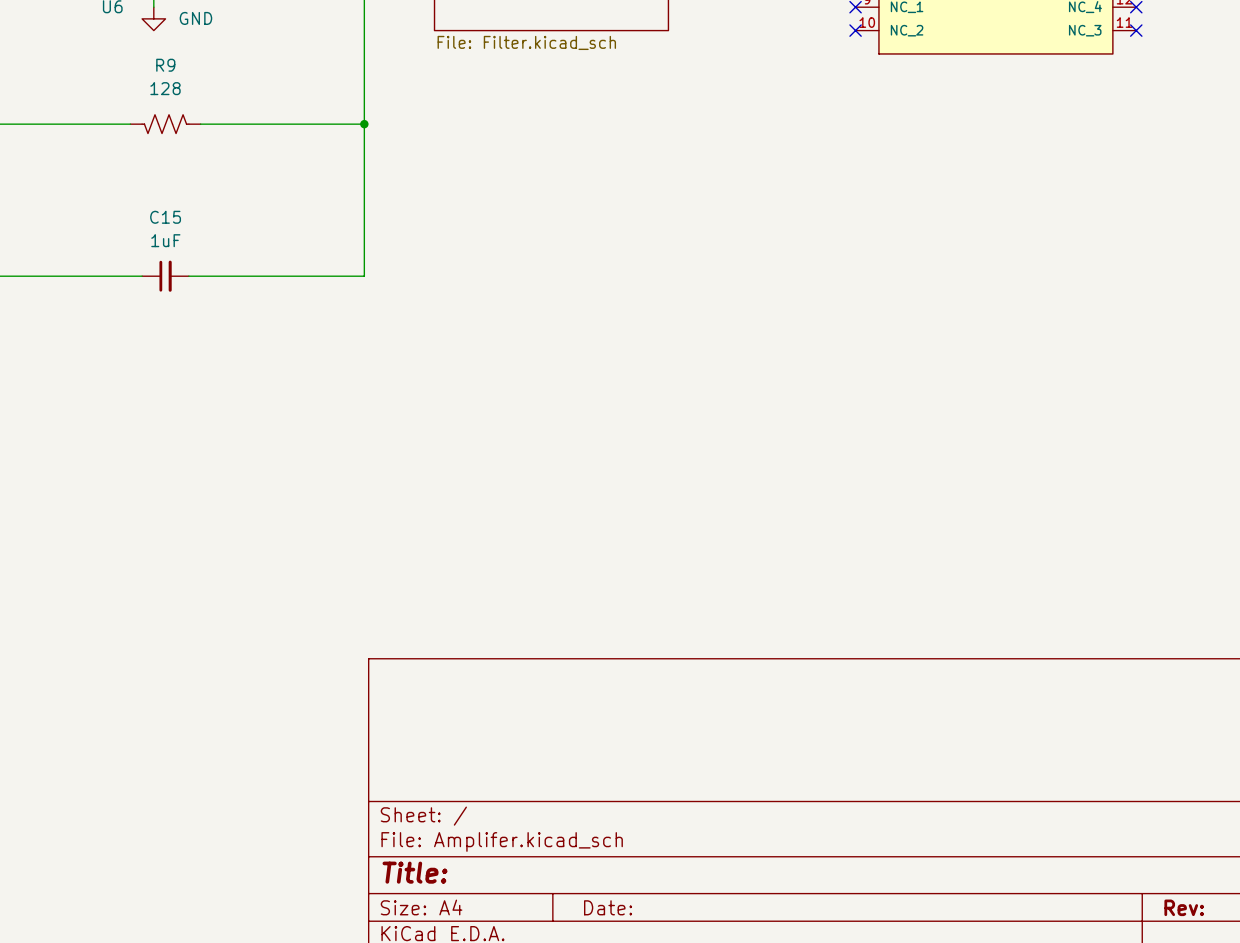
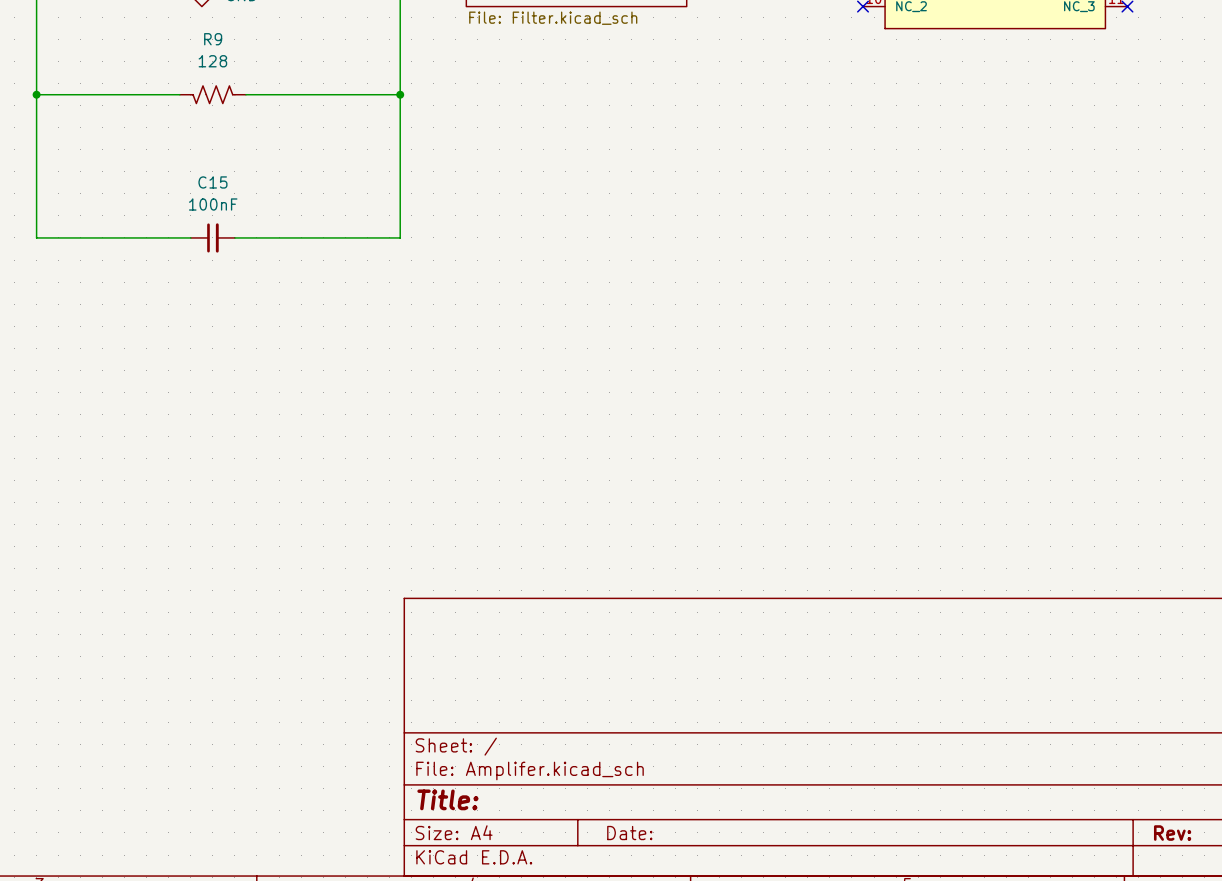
C15 value: 1uF (165, 240) -> 100nF (213, 204)

